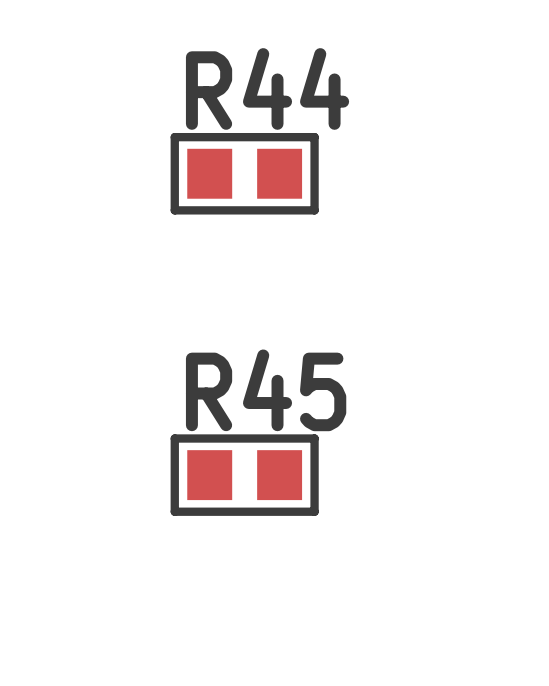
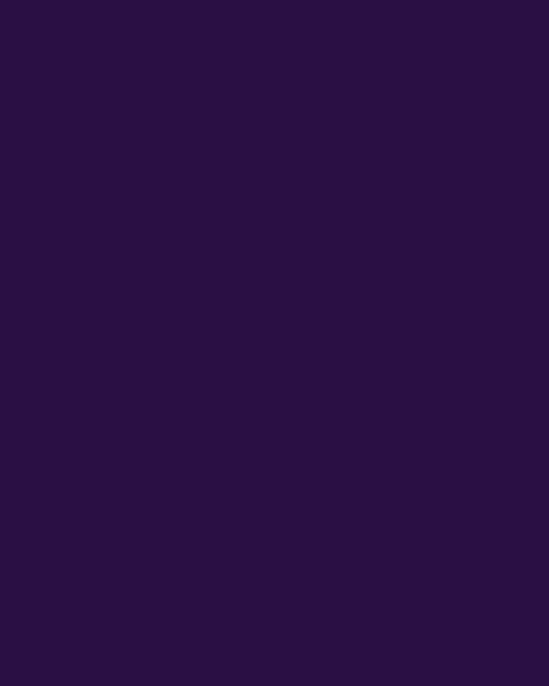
R44: (244, 173) -> none
R45: (244, 475) -> none

